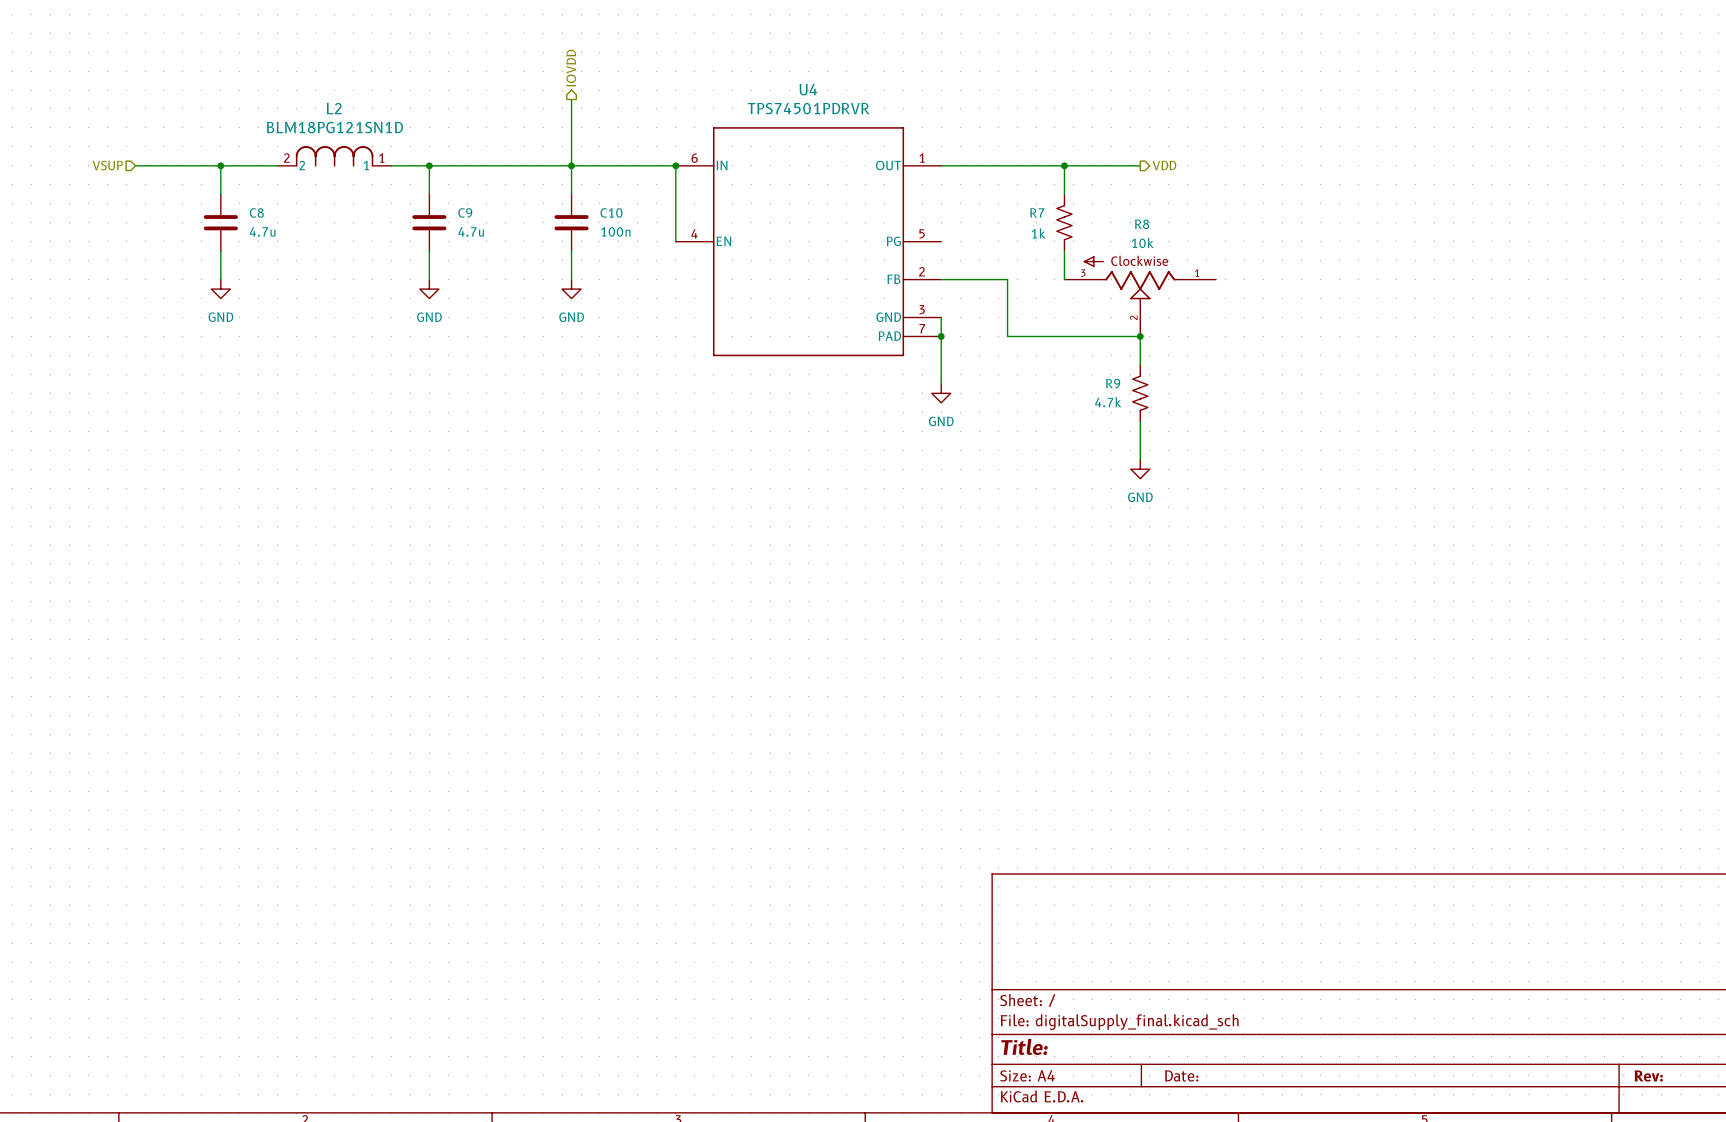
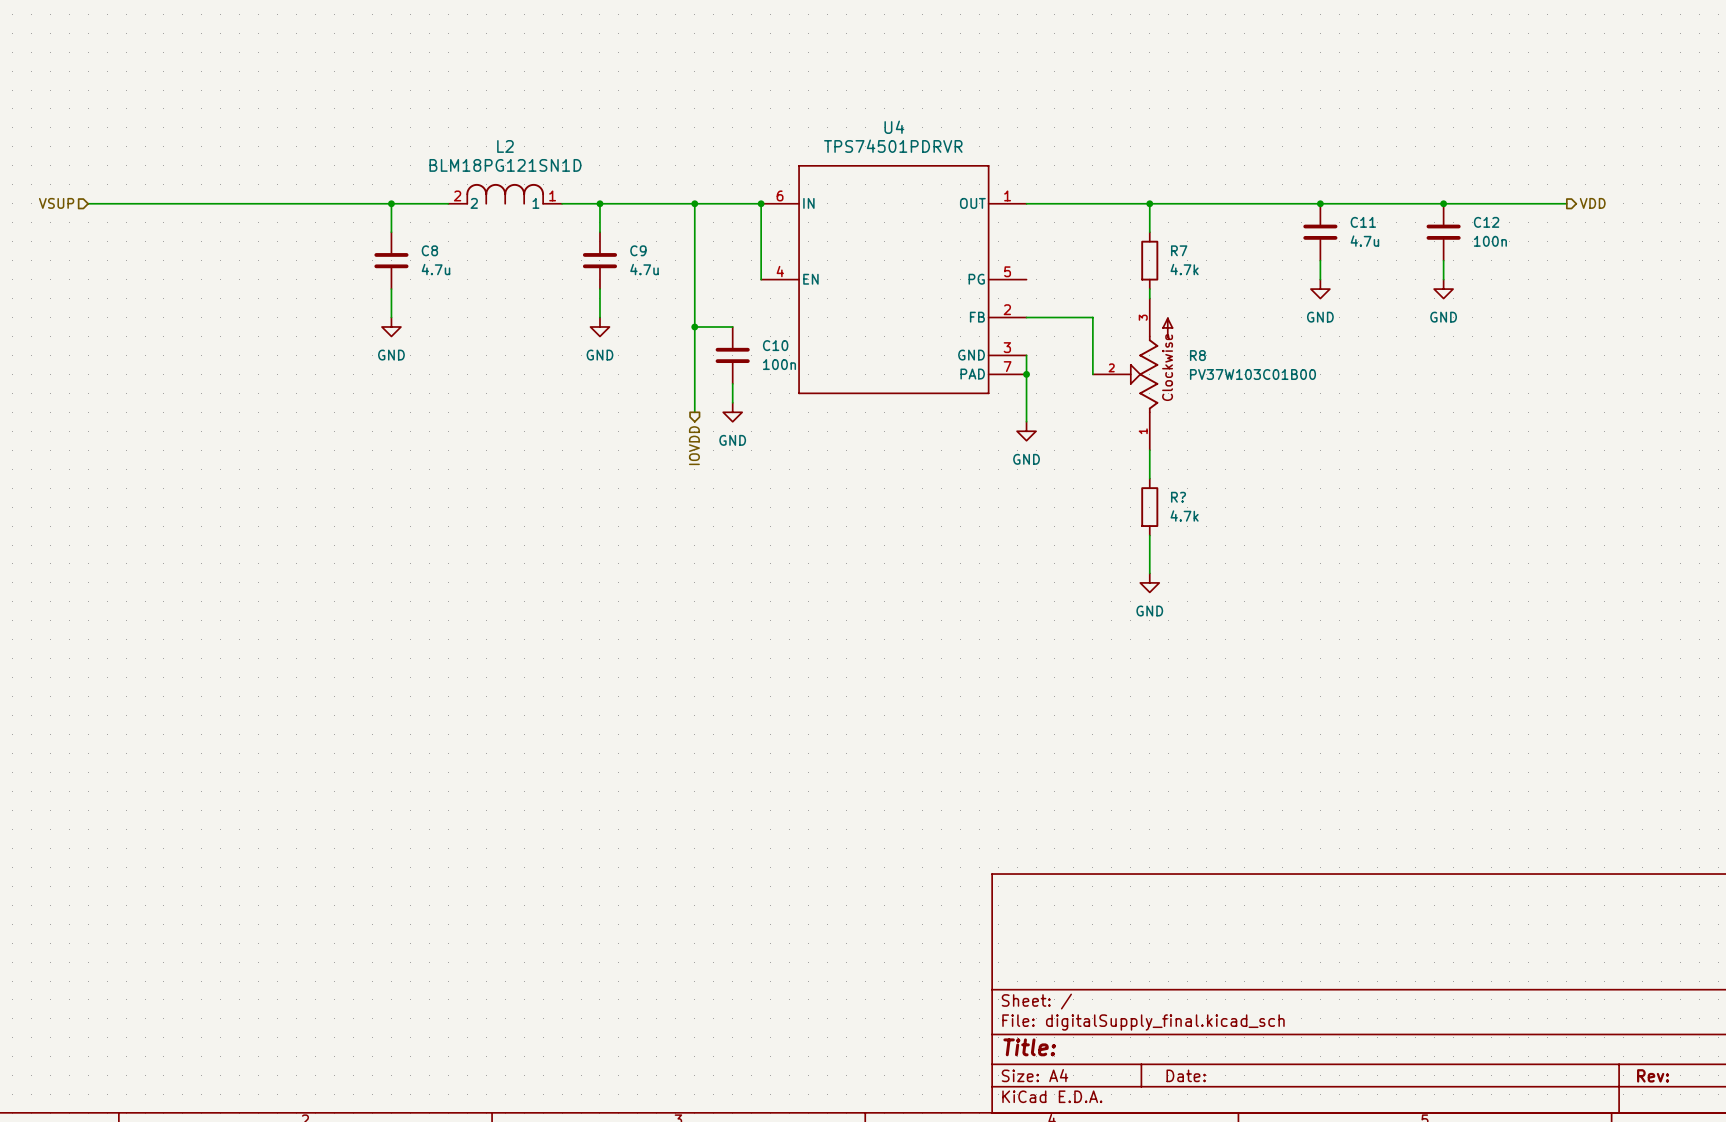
hierarchical label: IOVDD (571, 68) -> none
wire: (571, 99) (571, 194) -> none
L2 position: (334, 156) -> (505, 194)
hierarchical label position: VSUP (107, 165) -> VSUP (56, 203)
wire: (135, 165) (277, 165) -> none
wire: (220, 165) (220, 194) -> (391, 203) (391, 232)
junction: (220, 165) -> none
wire: (391, 165) (675, 165) (675, 241) -> none
wire: (429, 165) (429, 194) -> (599, 203) (599, 232)
junction: (429, 165) -> none
junction: (571, 165) -> none
junction: (675, 165) -> none
wire: (941, 165) (1140, 165) -> none
wire: (1064, 165) (1064, 194) -> (1149, 203) (1149, 232)
junction: (1064, 165) -> none
hierarchical label: VDD (1164, 165) -> none
R7 symbol: [1056, 194, 1073, 252] -> [1141, 232, 1159, 290]
wire: none -> (88, 203) (448, 203)
junction: none -> (391, 203)
wire: none -> (562, 203) (761, 203) (761, 279)
junction: none -> (599, 203)
wire: none -> (694, 203) (694, 412)
junction: none -> (694, 203)
junction: none -> (761, 203)
wire: none -> (1026, 203) (1566, 203)
junction: none -> (1149, 203)
junction: none -> (1320, 203)
junction: none -> (1443, 203)
hierarchical label: none -> VDD (1592, 203)
R7 name position: R7 (1037, 212) -> R7 (1179, 250)
C8 position: (220, 222) -> (391, 260)
C9 position: (429, 222) -> (599, 260)
C10 position: (571, 222) -> (732, 355)
R8 name position: R8 (1142, 224) -> R8 (1197, 355)
C11: none -> 4.7u (1320, 232)
C12: none -> 100n (1443, 232)
R7 value: 1k (1038, 233) -> 4.7k (1184, 269)
U4 position: (808, 241) -> (893, 279)
R8 value: 10k (1142, 242) -> PV37W103C01B00 (1252, 374)
wire: (220, 251) (220, 279) -> (391, 289) (391, 317)
wire: (429, 251) (429, 279) -> (599, 289) (599, 317)
wire: (571, 251) (571, 279) -> none
wire: (1064, 251) (1064, 279) -> none
wire: none -> (1320, 260) (1320, 279)
wire: none -> (1443, 260) (1443, 279)
R8 rotation: 0° (1131, 277) -> 90° clockwise (1151, 365)
wire: (941, 279) (1007, 279) (1007, 336) (1140, 336) (1140, 364) -> none
power symbol: GND (220, 289) -> none
power symbol position: GND (429, 289) -> GND (391, 326)
power symbol position: GND (571, 289) -> GND (599, 326)
wire: none -> (1149, 289) (1149, 298)
power symbol: none -> GND (1320, 289)
power symbol: none -> GND (1443, 289)
wire: (941, 317) (941, 383) -> (1026, 355) (1026, 421)
wire: none -> (1026, 317) (1092, 317) (1092, 374)
wire: none -> (694, 326) (732, 326)
junction: none -> (694, 326)
junction: (941, 336) -> none
junction: (1140, 336) -> none
junction: none -> (1026, 374)
wire: none -> (732, 383) (732, 402)
power symbol: GND (941, 393) -> none
R9: 4.7k (1140, 393) -> none
power symbol: none -> GND (732, 412)
wire: (1140, 421) (1140, 459) -> (1149, 535) (1149, 573)
power symbol: none -> GND (1026, 431)
hierarchical label: none -> IOVDD (694, 445)
wire: none -> (1149, 450) (1149, 478)
power symbol: GND (1140, 469) -> none
R?: none -> 4.7k (1149, 507)
power symbol: none -> GND (1149, 582)

